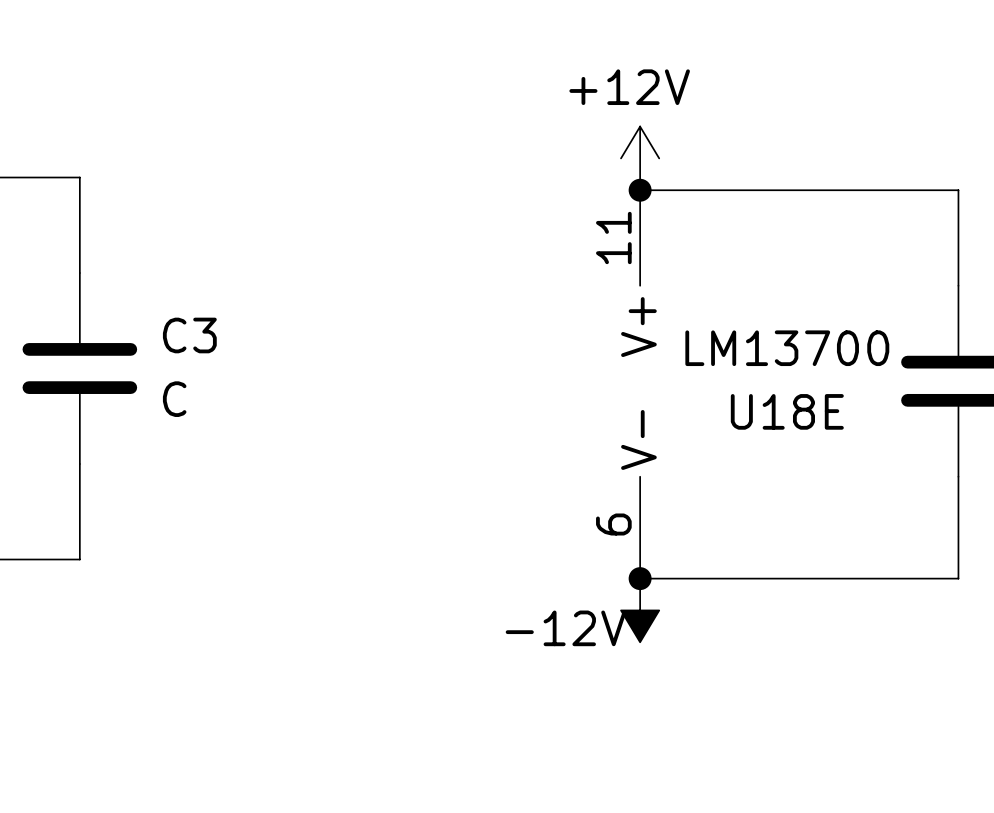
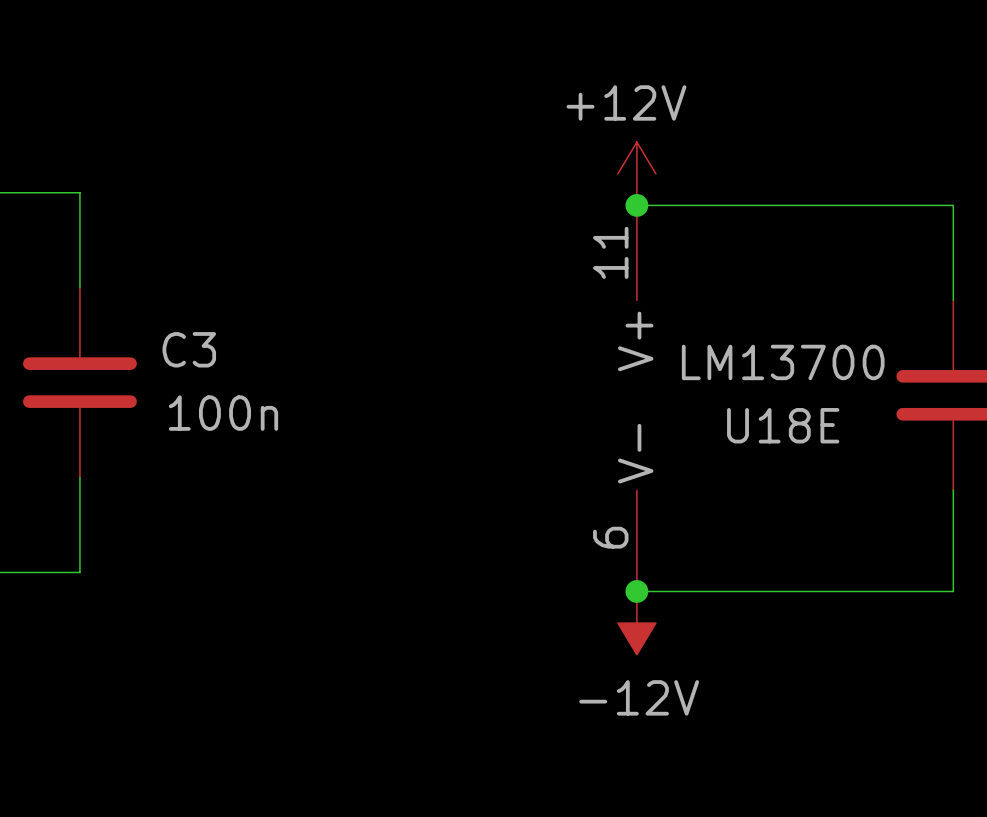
C3 value: C (174, 399) -> 100n (223, 413)
power symbol text position: -12V (565, 628) -> -12V (639, 697)

